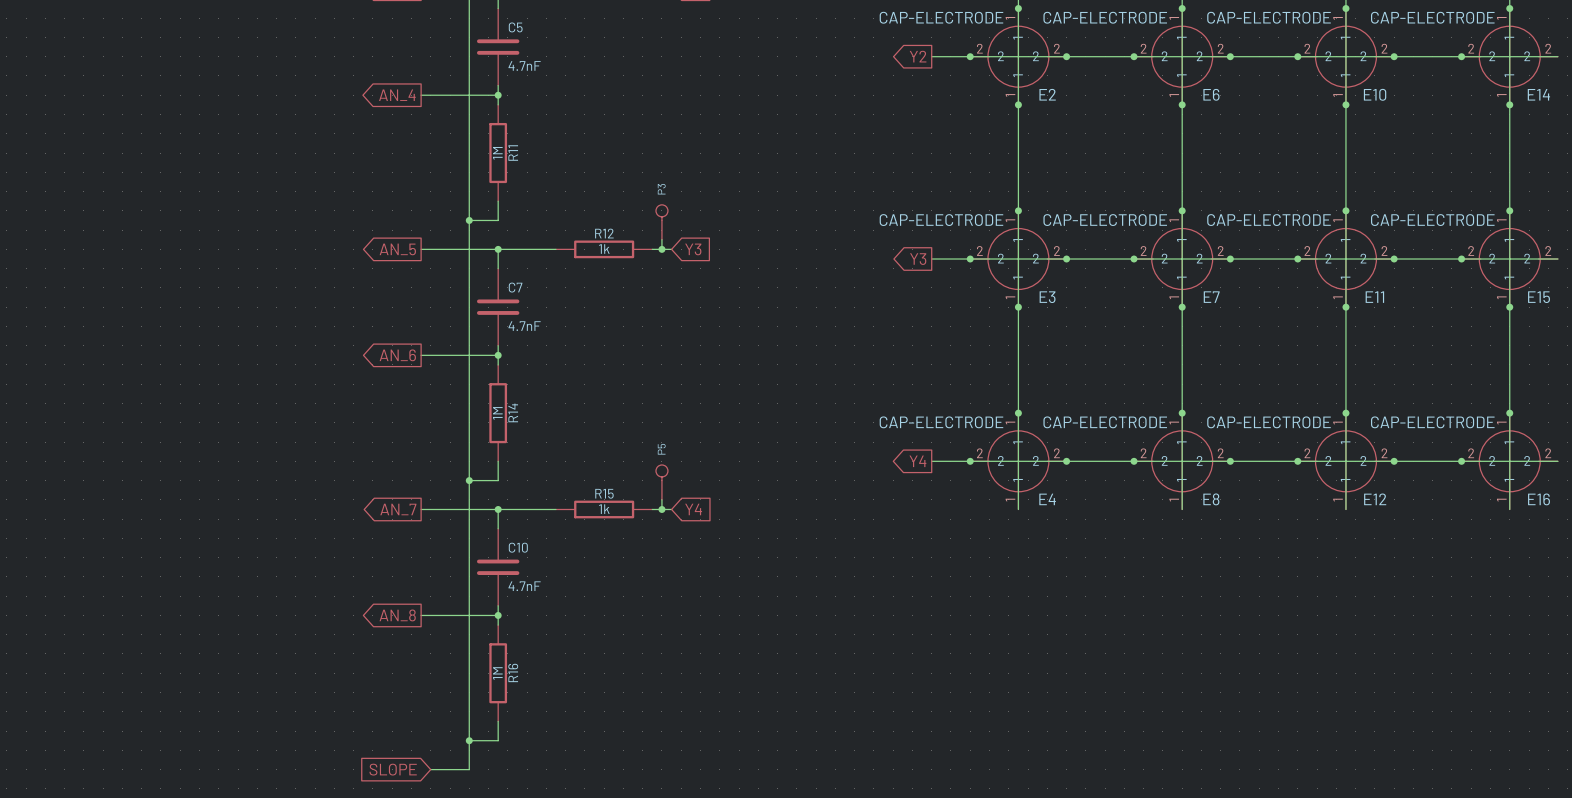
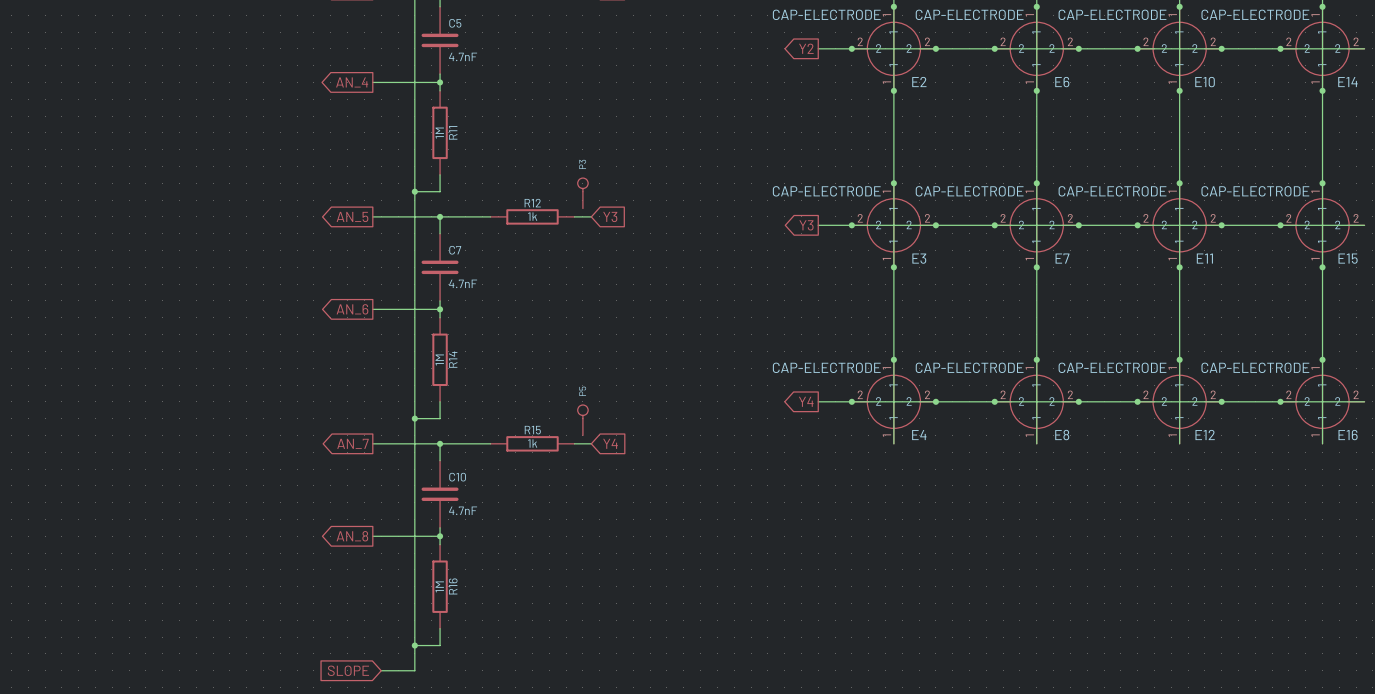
wire: (661, 239) (661, 249) -> none
junction: (661, 249) -> none
wire: (661, 499) (661, 509) -> none
junction: (661, 509) -> none

